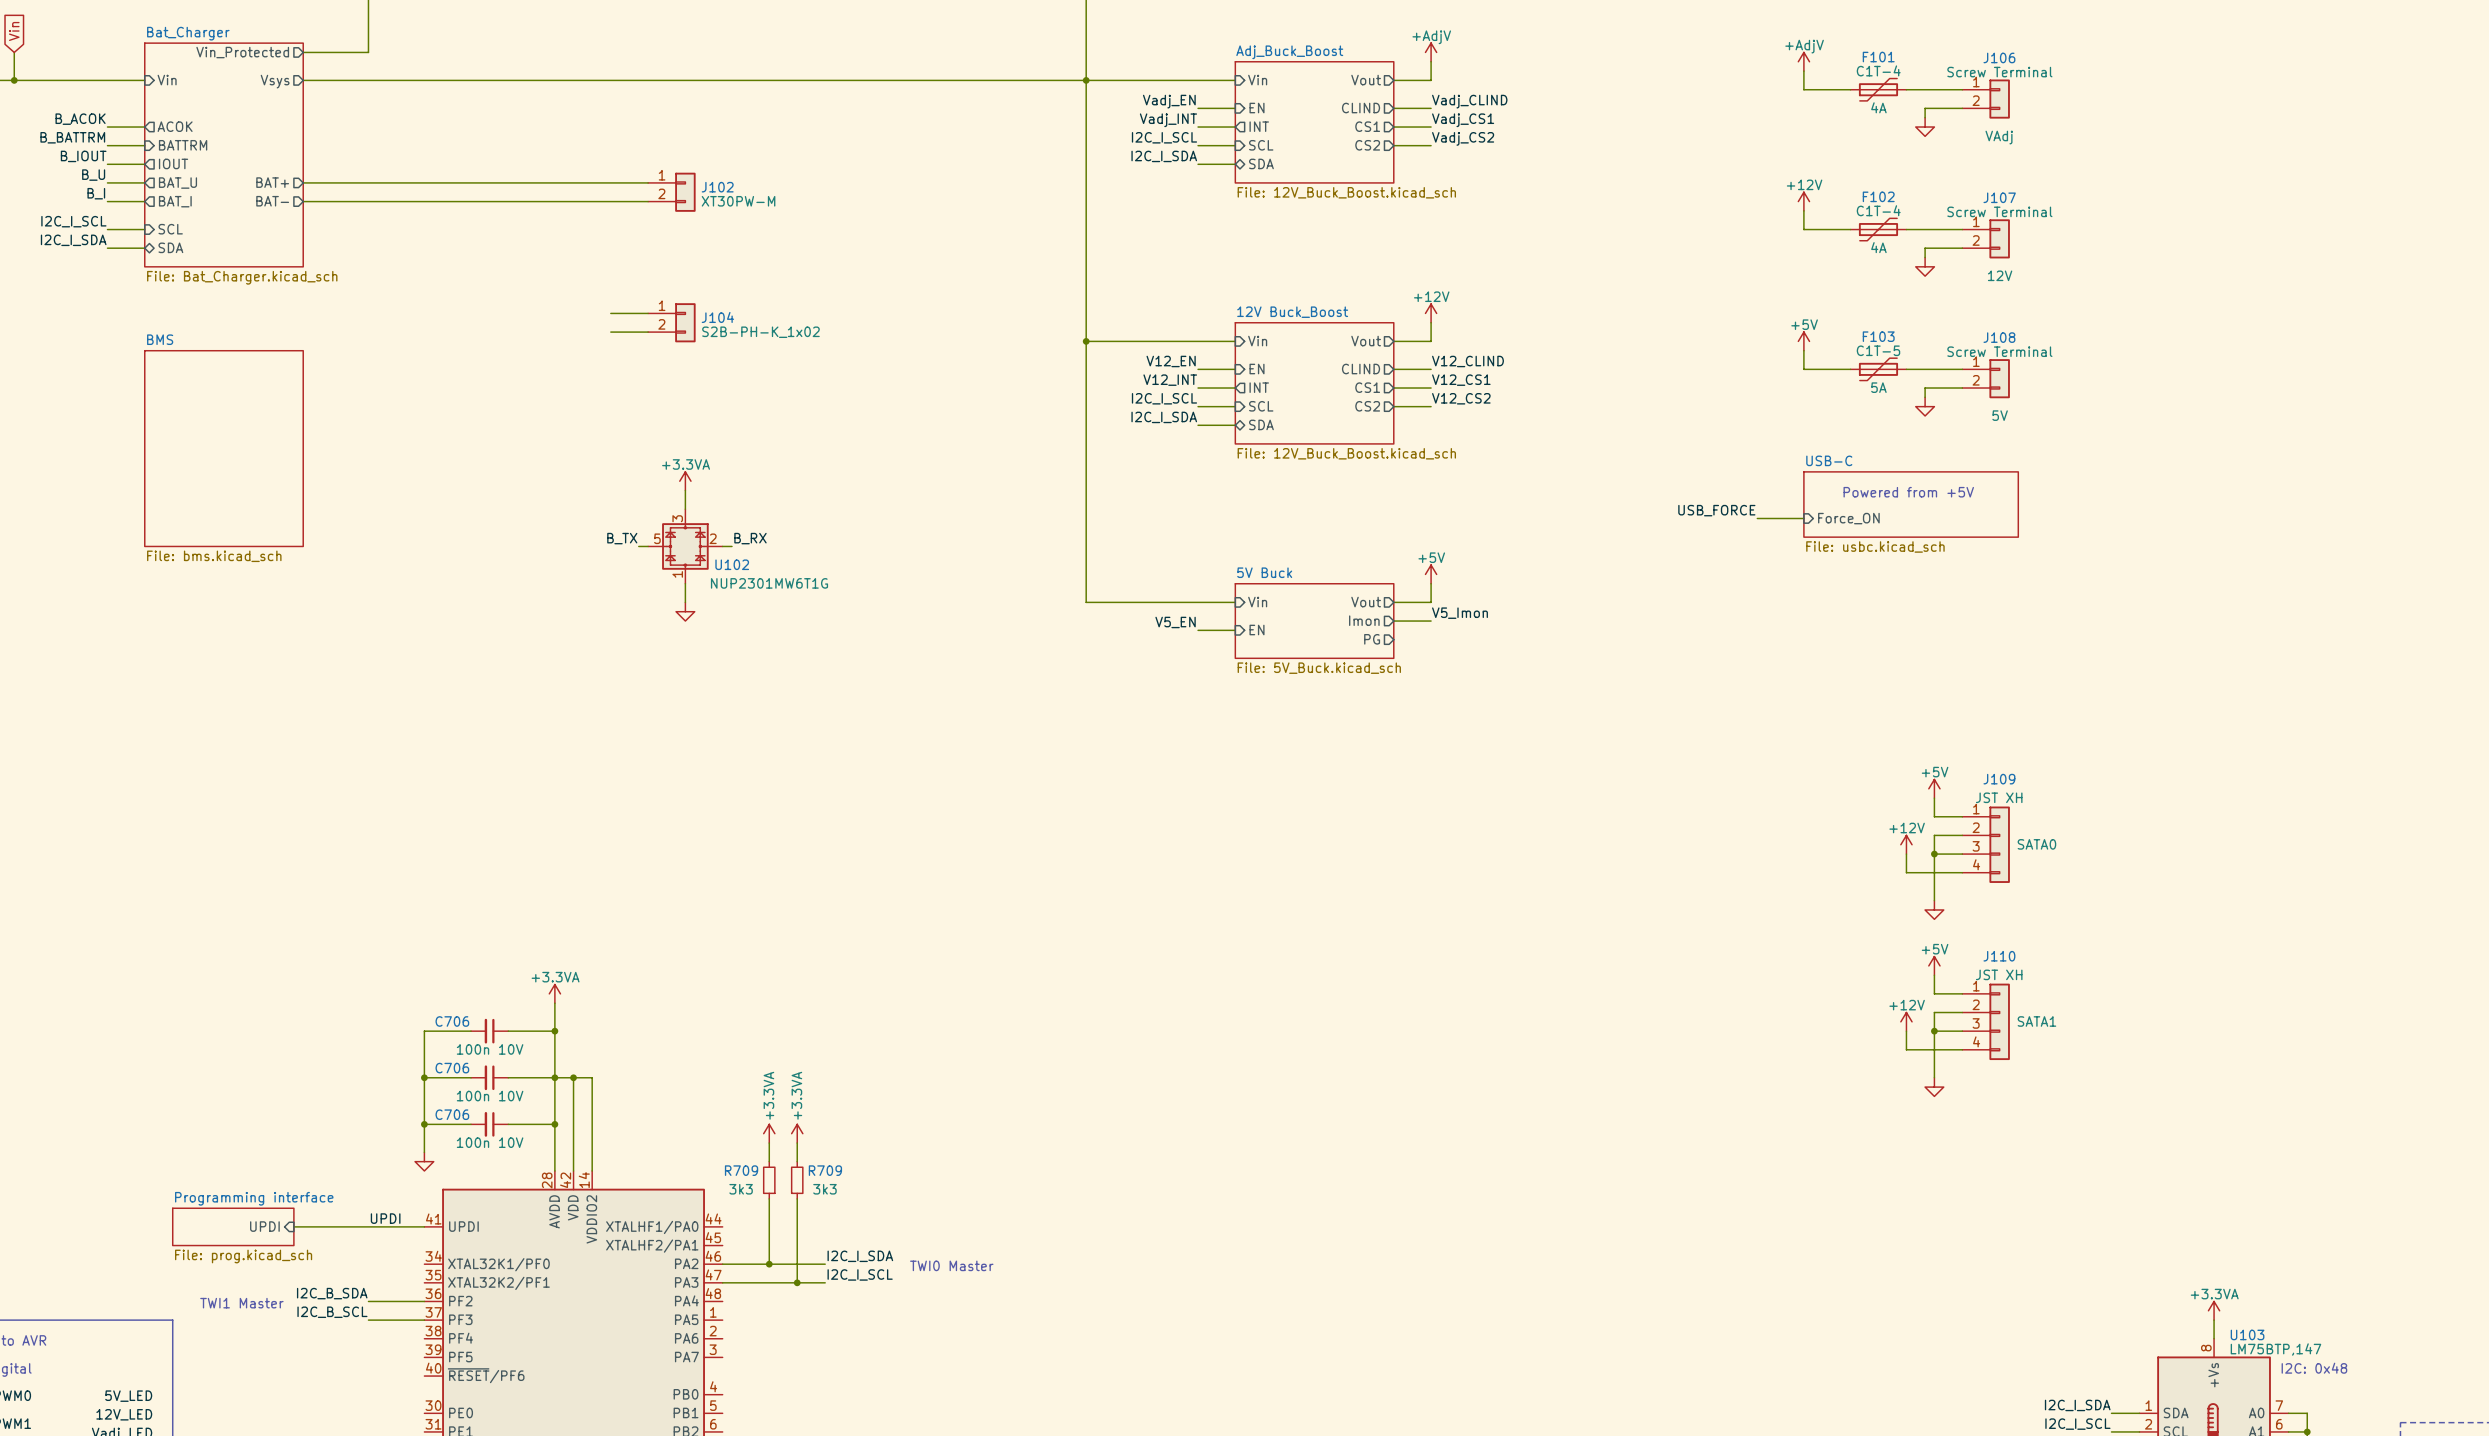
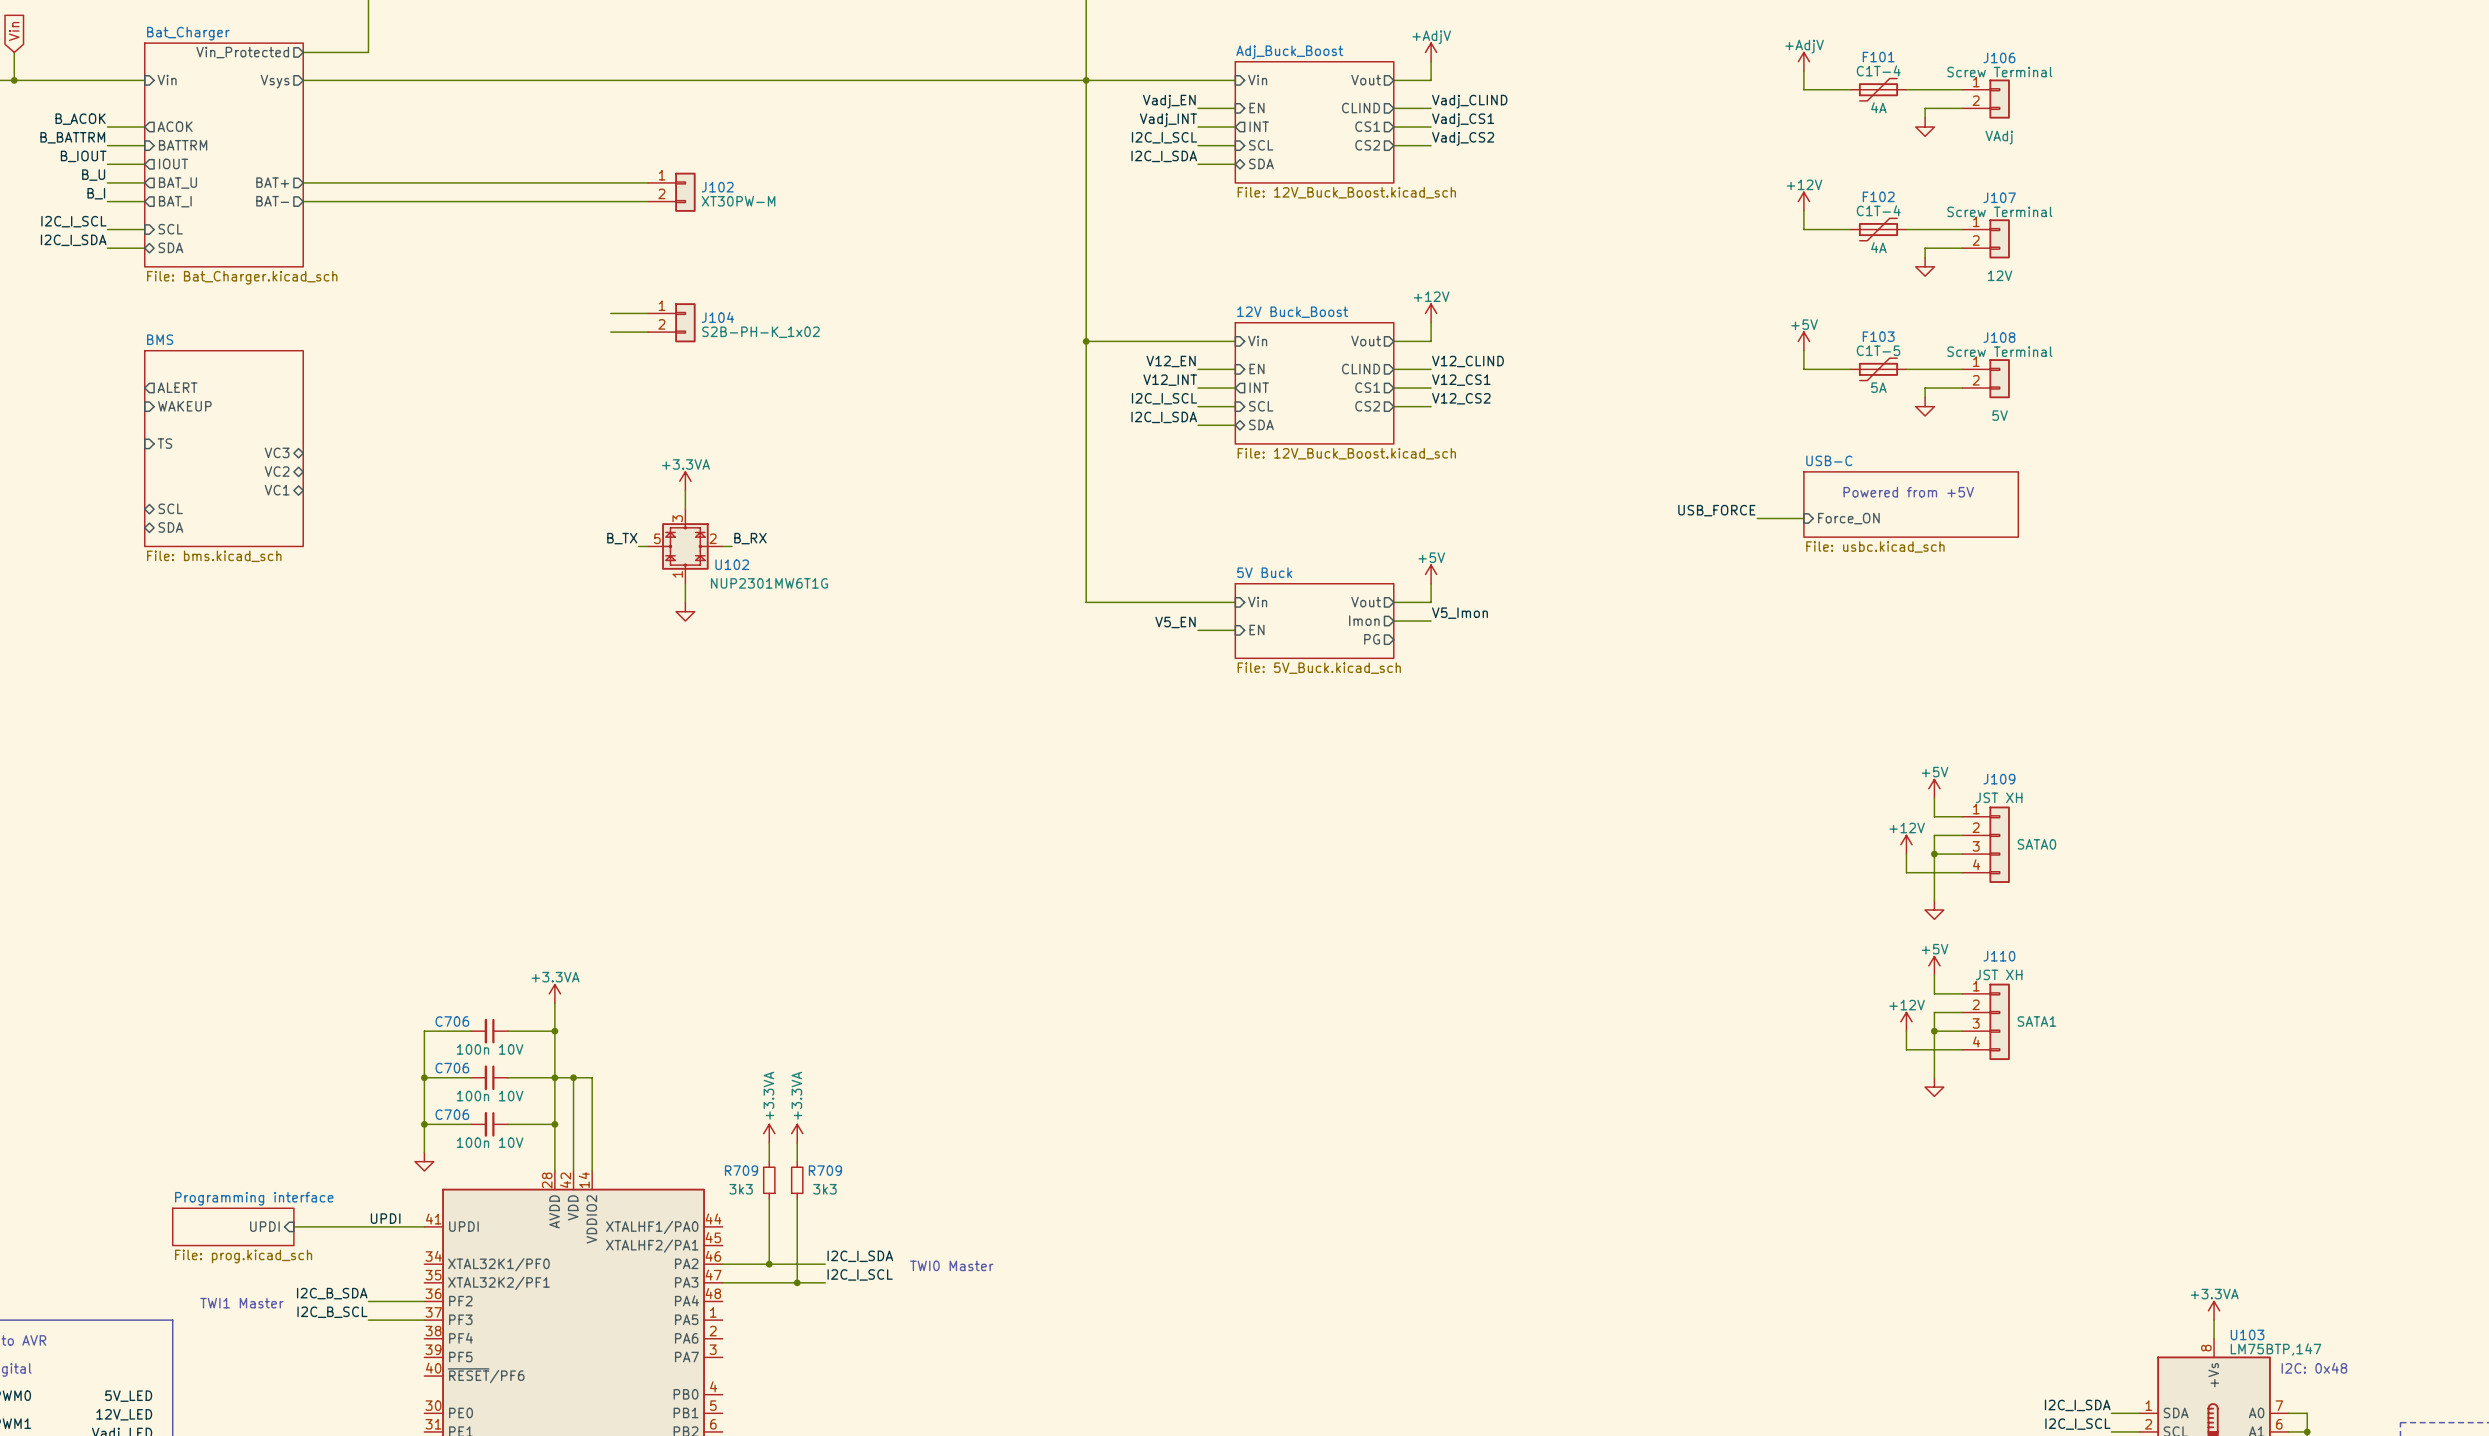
sheet pin: none -> ALERT (177, 387)
sheet pin: none -> WAKEUP (184, 406)
sheet pin: none -> TS (164, 443)
sheet pin: none -> VC3 (277, 452)
sheet pin: none -> VC2 (277, 471)
sheet pin: none -> VC1 (277, 490)
sheet pin: none -> SCL (170, 508)
sheet pin: none -> SDA (170, 527)

